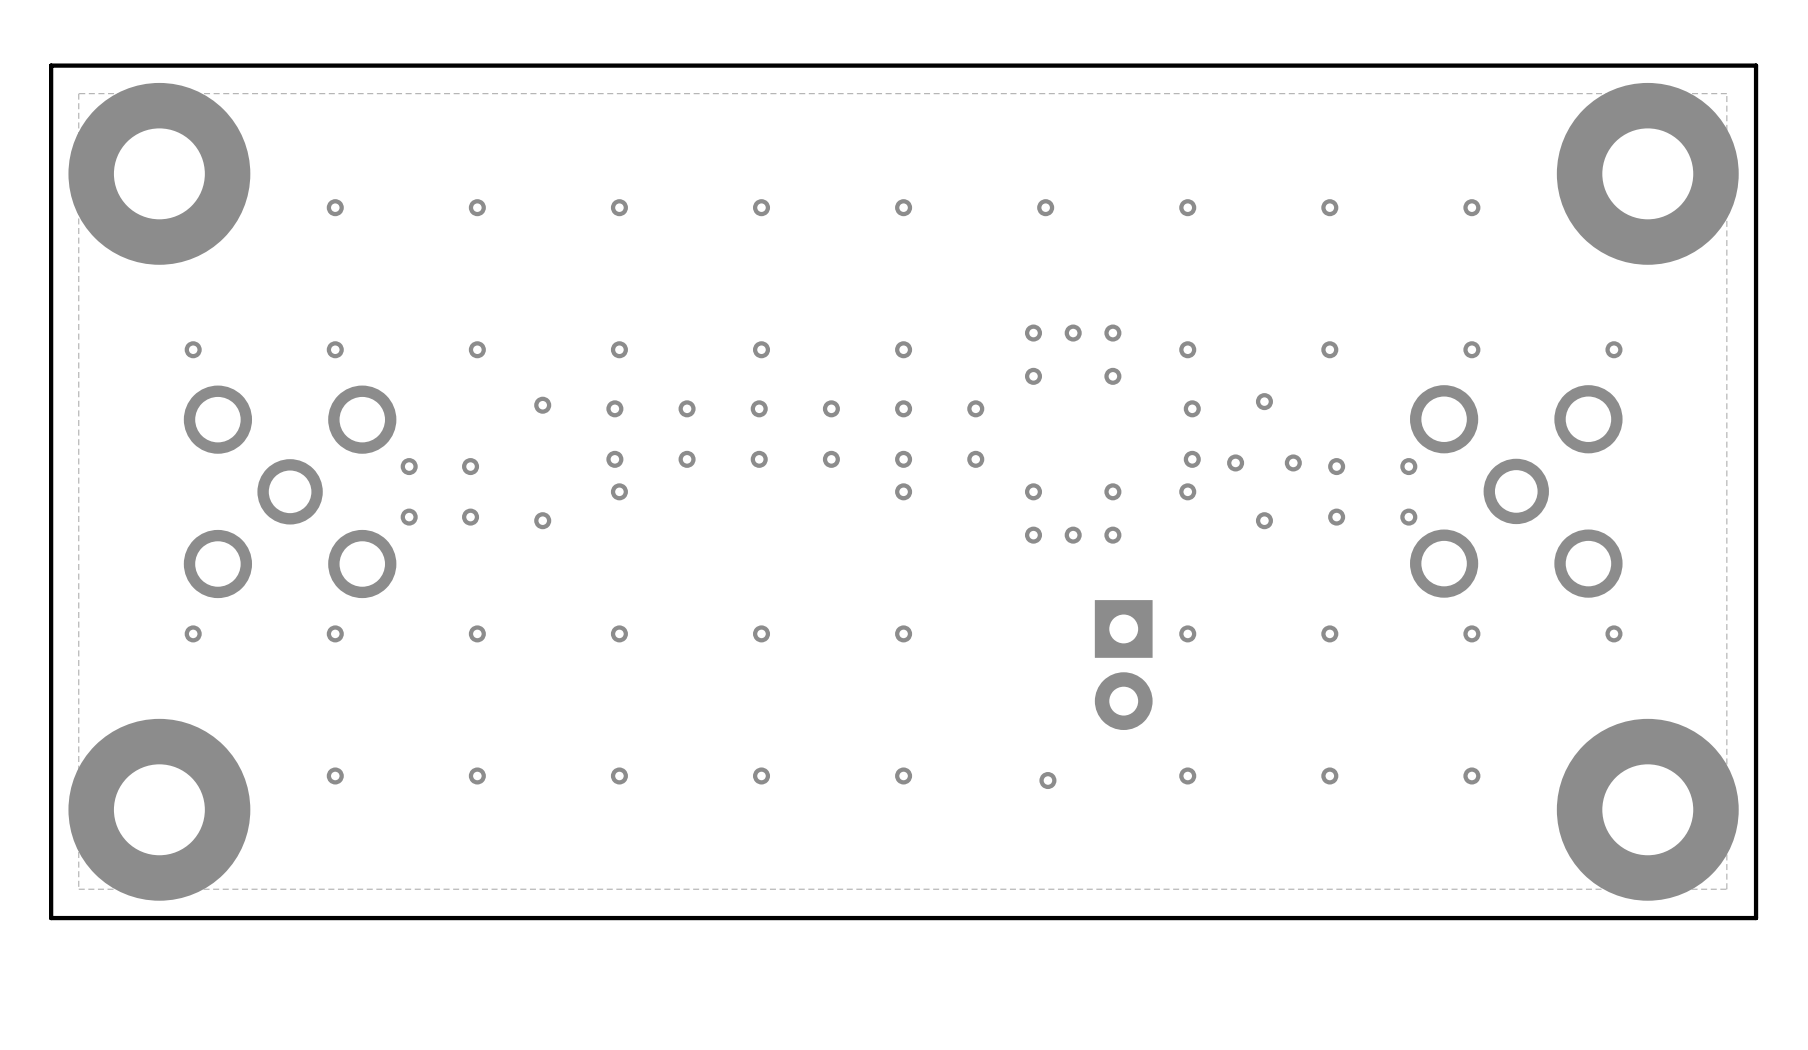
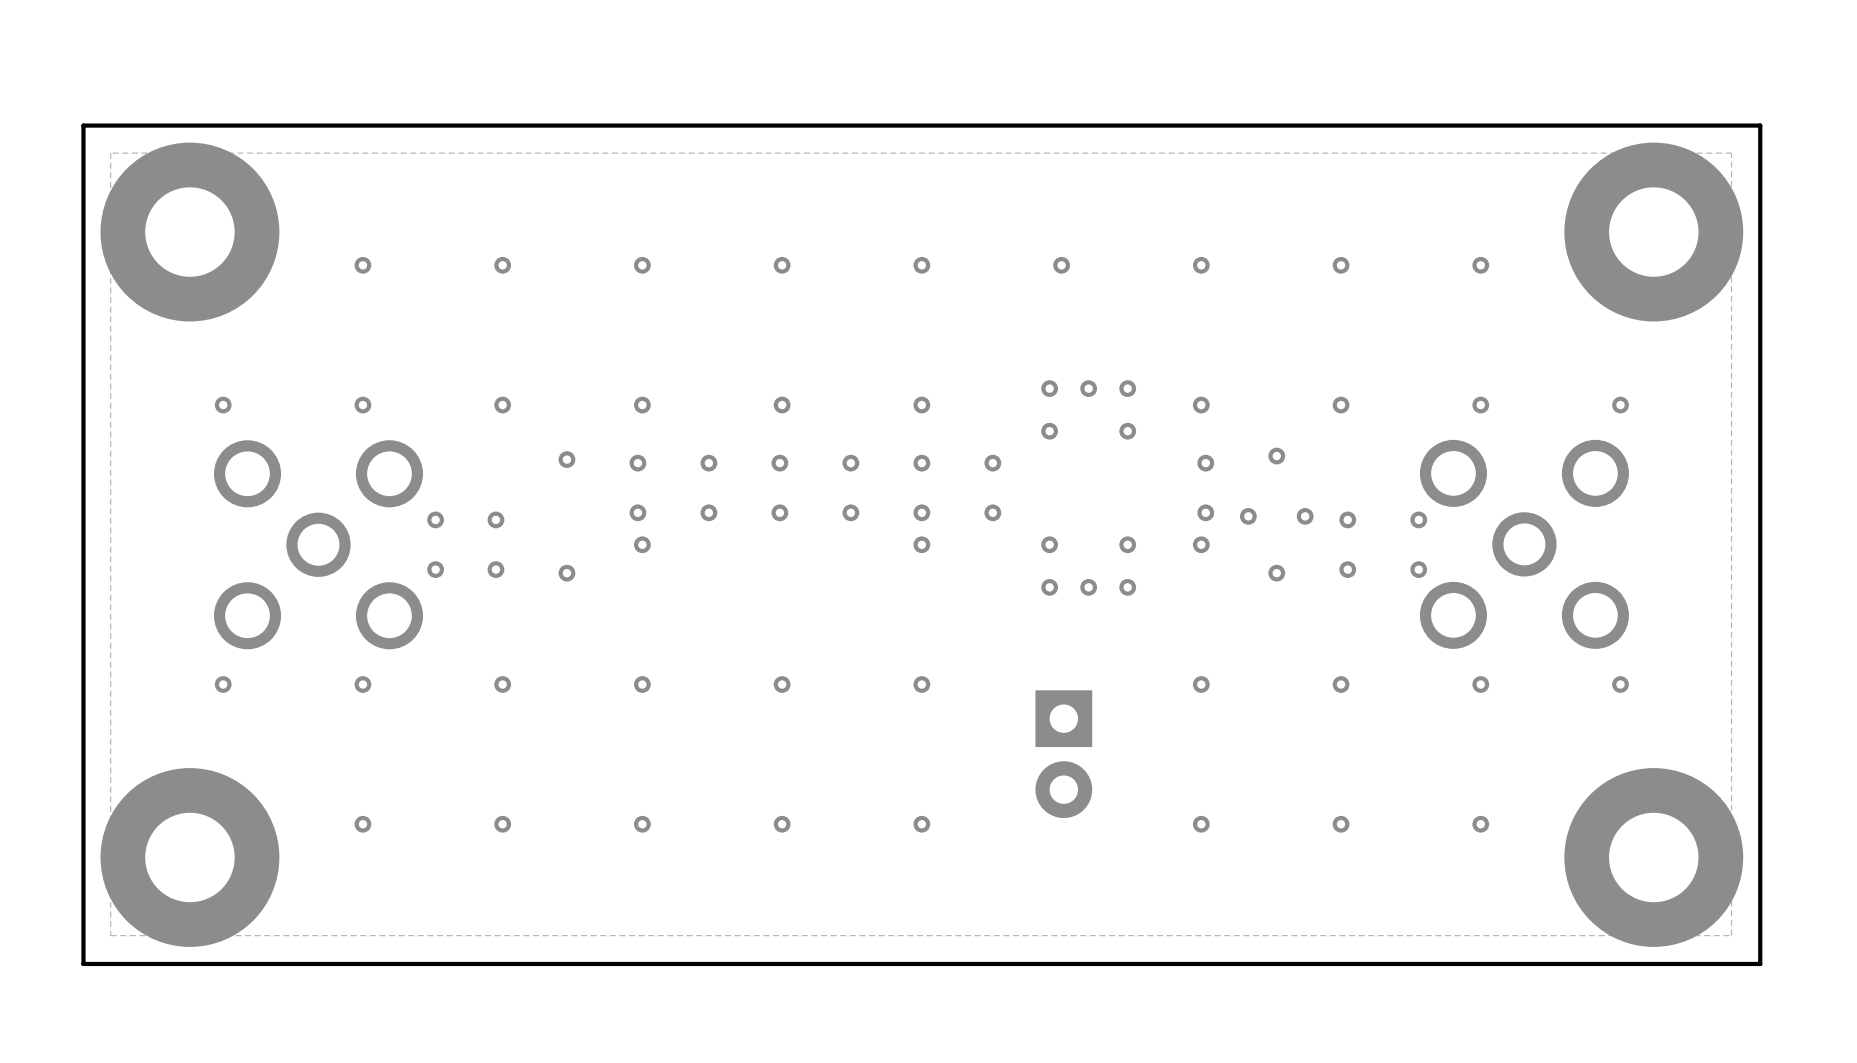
part position: (1123, 665) -> (1063, 754)
part: (1047, 780) -> none

